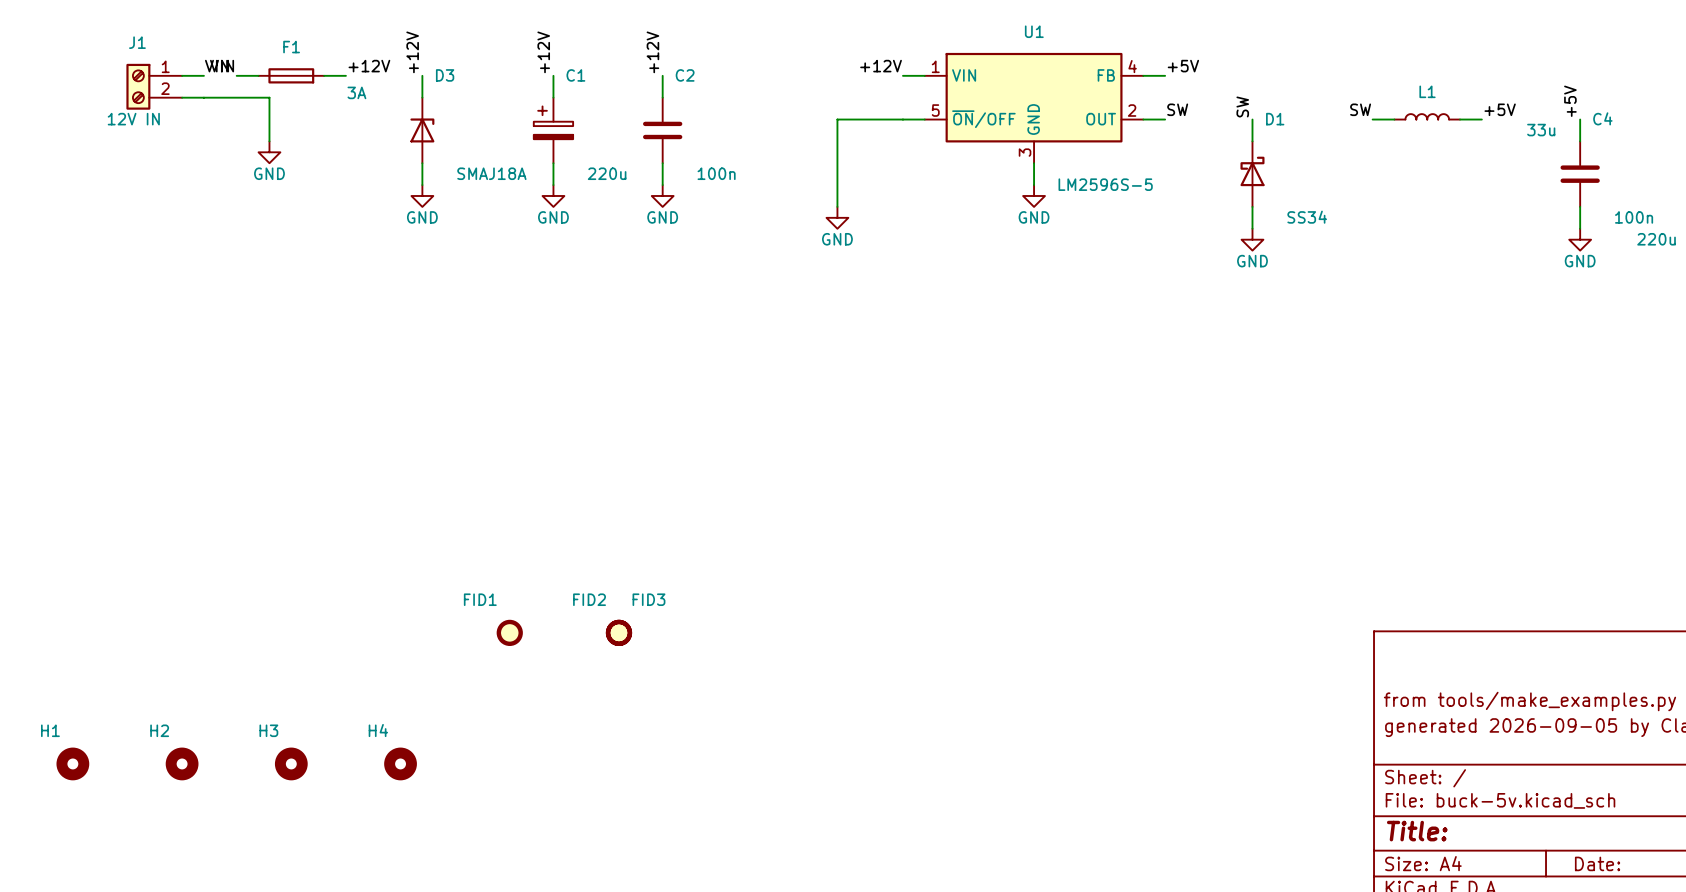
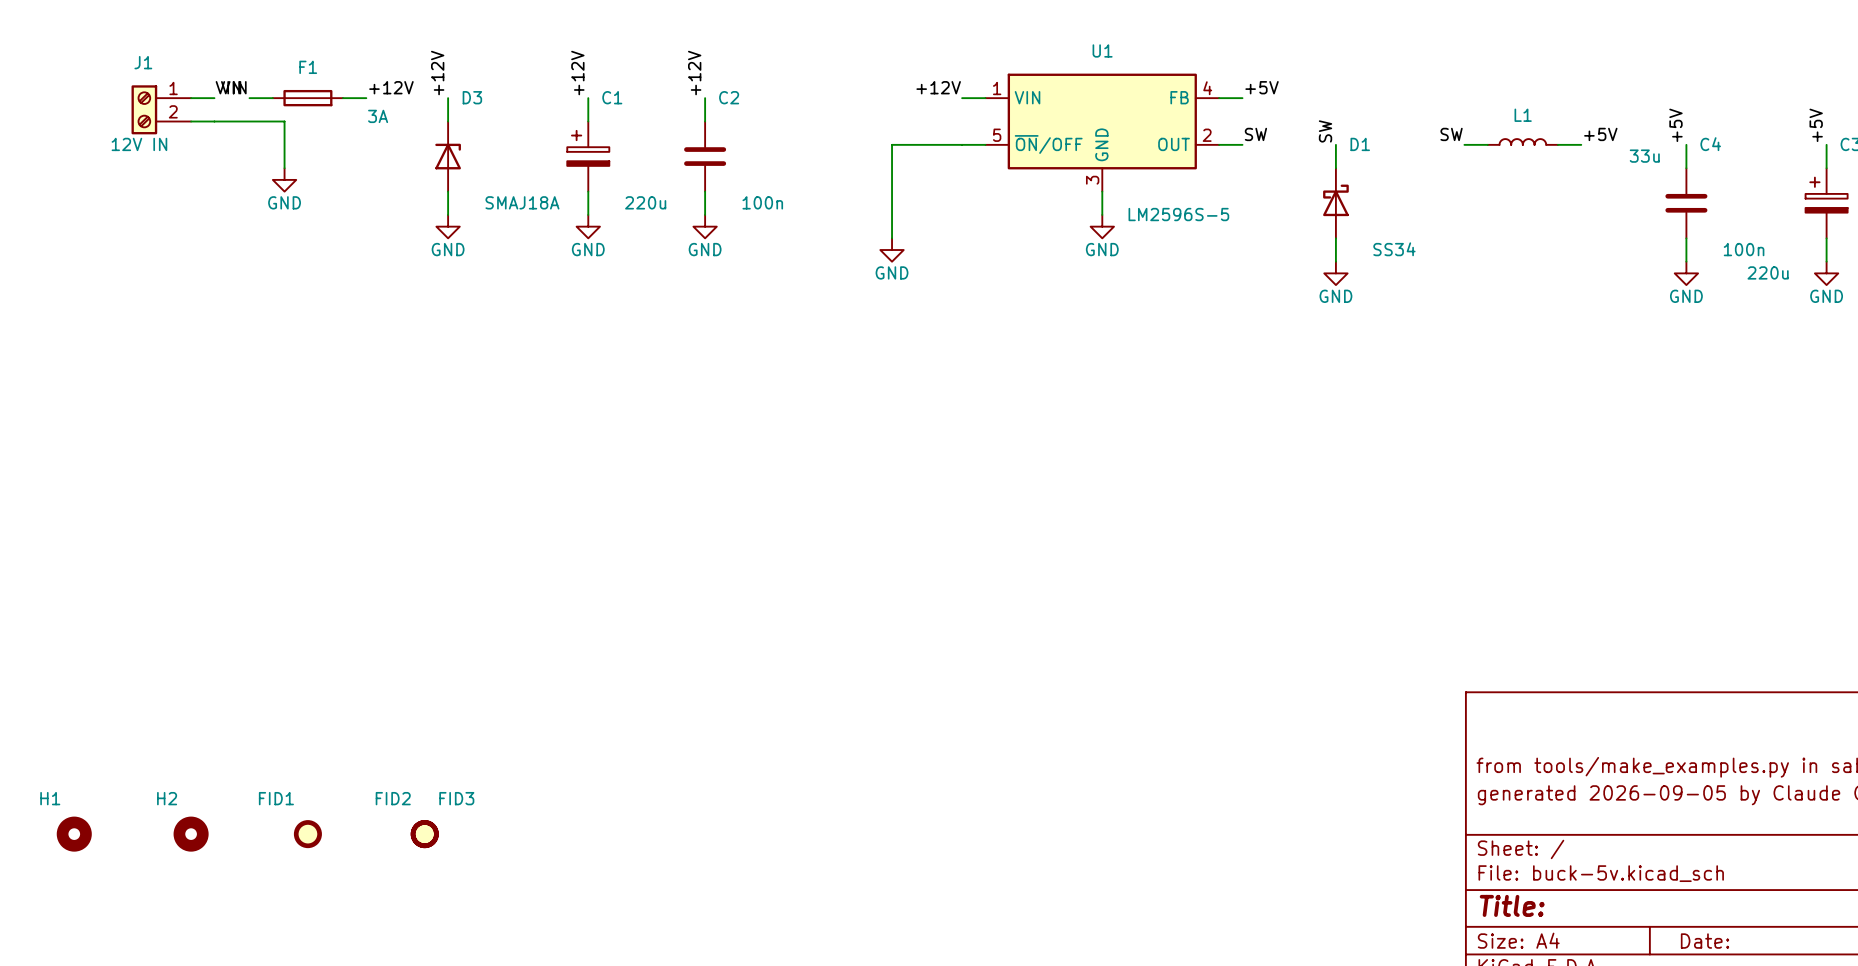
FID1 position: (509, 632) -> (307, 834)
FID2 position: (618, 632) -> (424, 834)
FID3 position: (618, 632) -> (424, 834)
H3: (291, 763) -> none
H4: (400, 763) -> none

